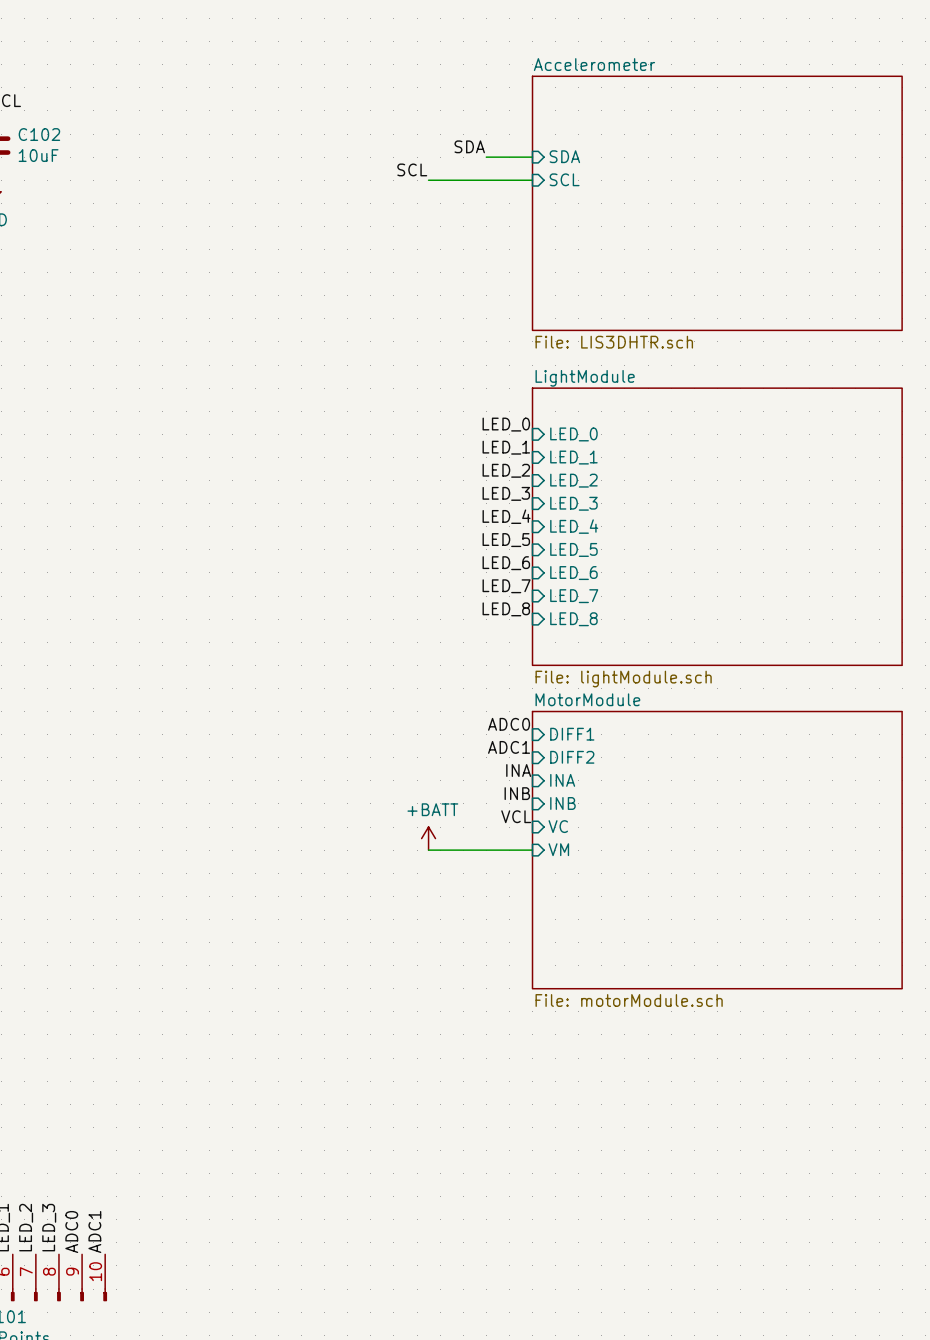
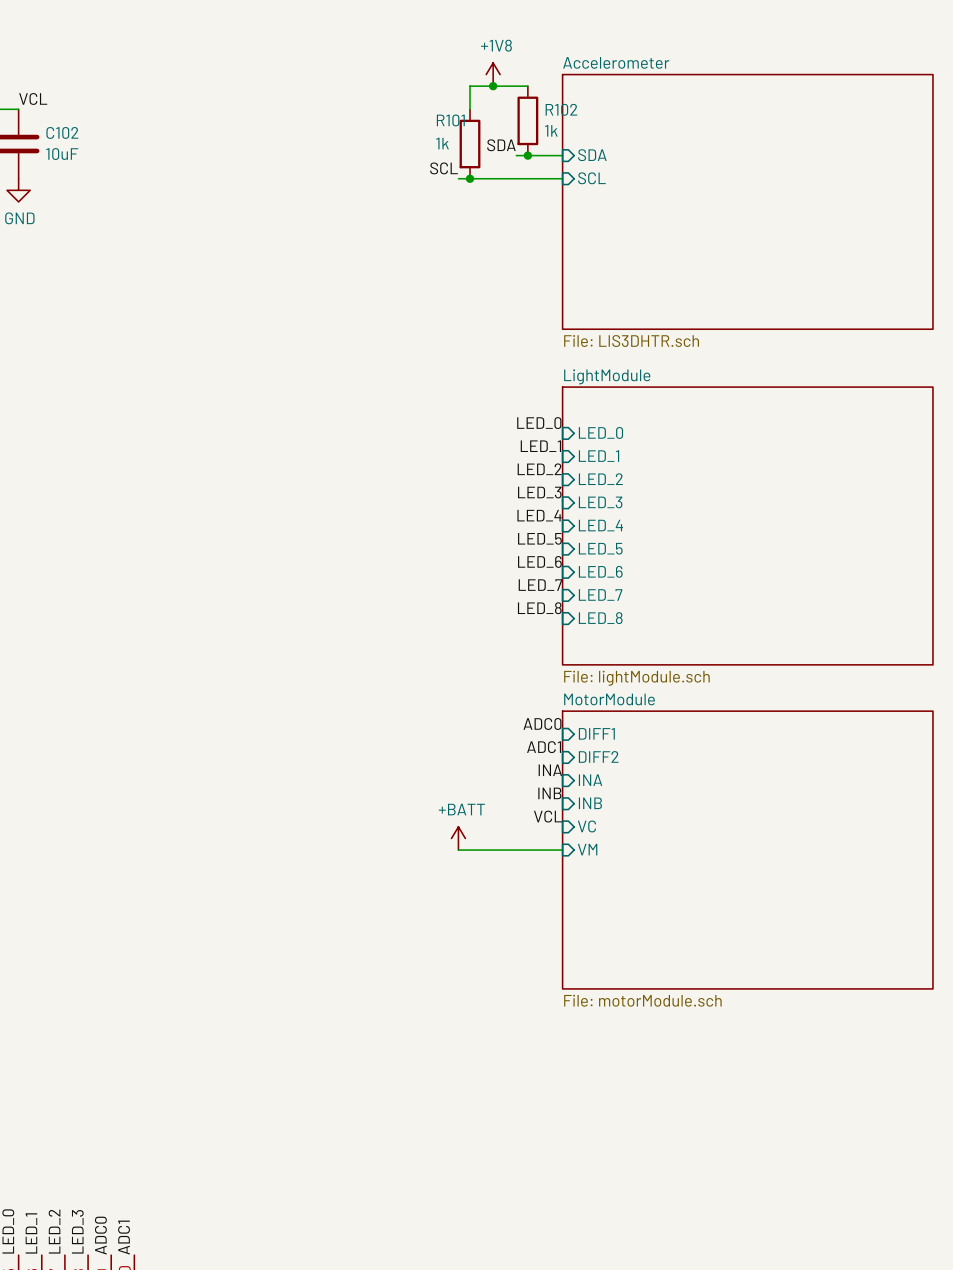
power symbol: none -> +1V8 (493, 74)
junction: none -> (493, 86)
wire: none -> (527, 86) (470, 86) (470, 109)
R102: none -> 1k (527, 120)
R101: none -> 1k (470, 144)
junction: none -> (527, 155)
junction: none -> (470, 178)

